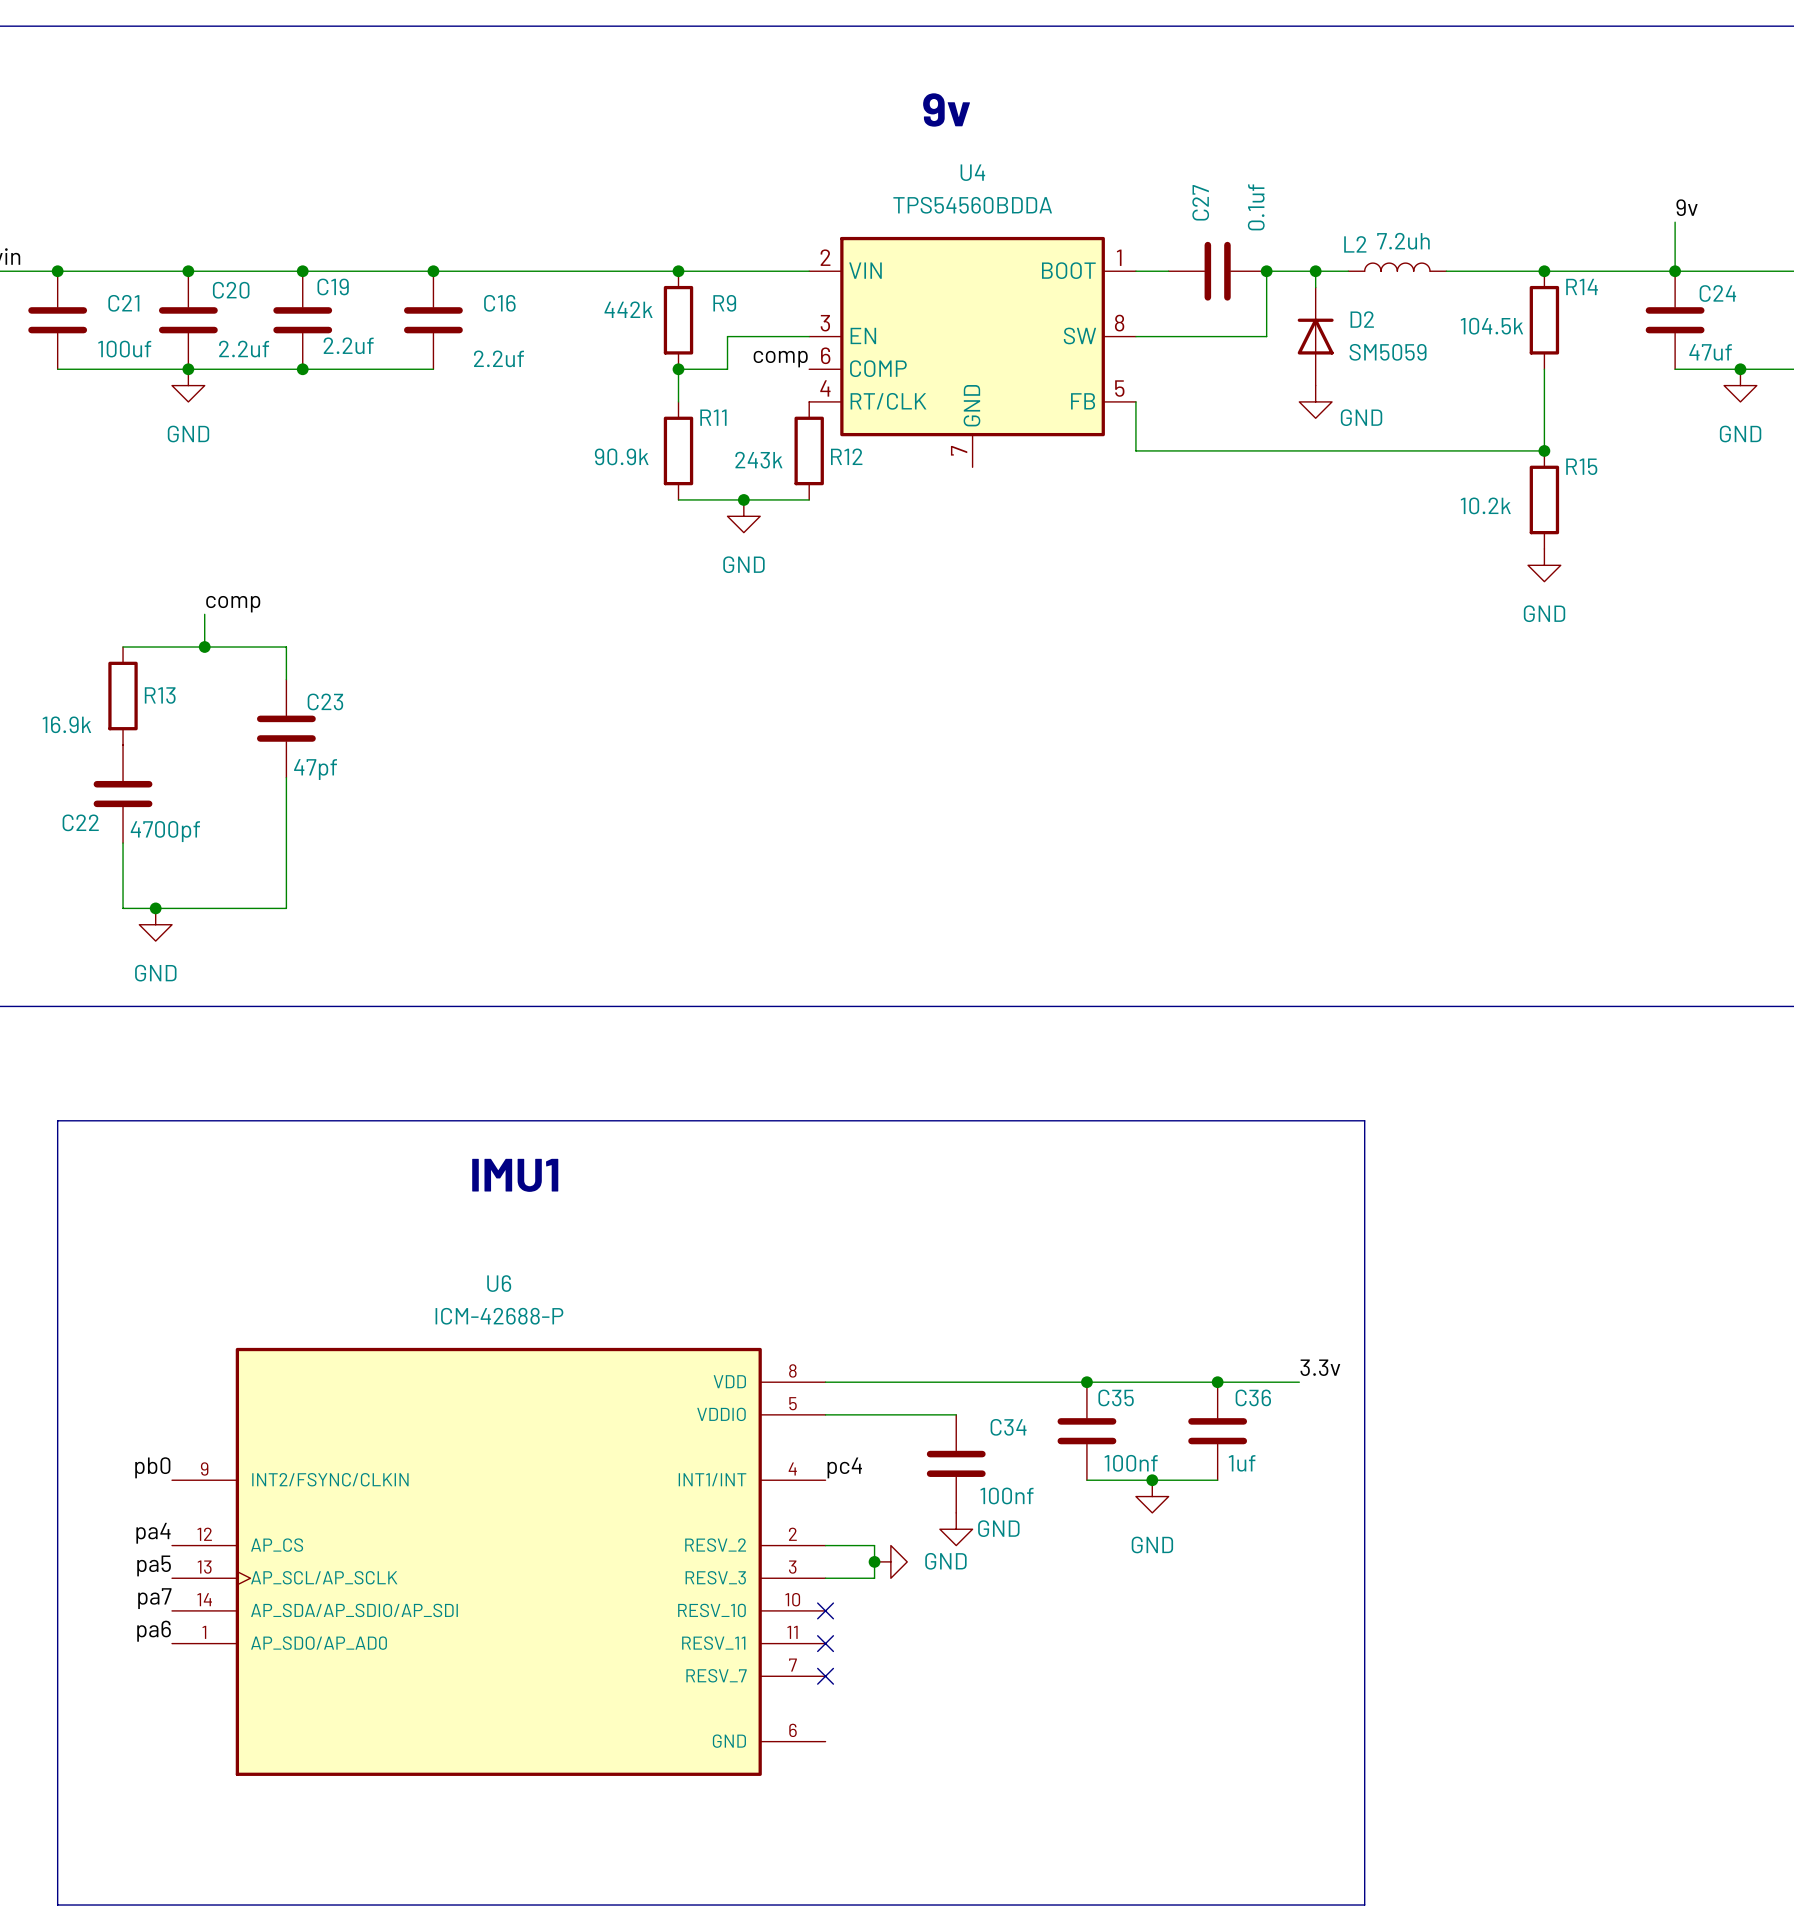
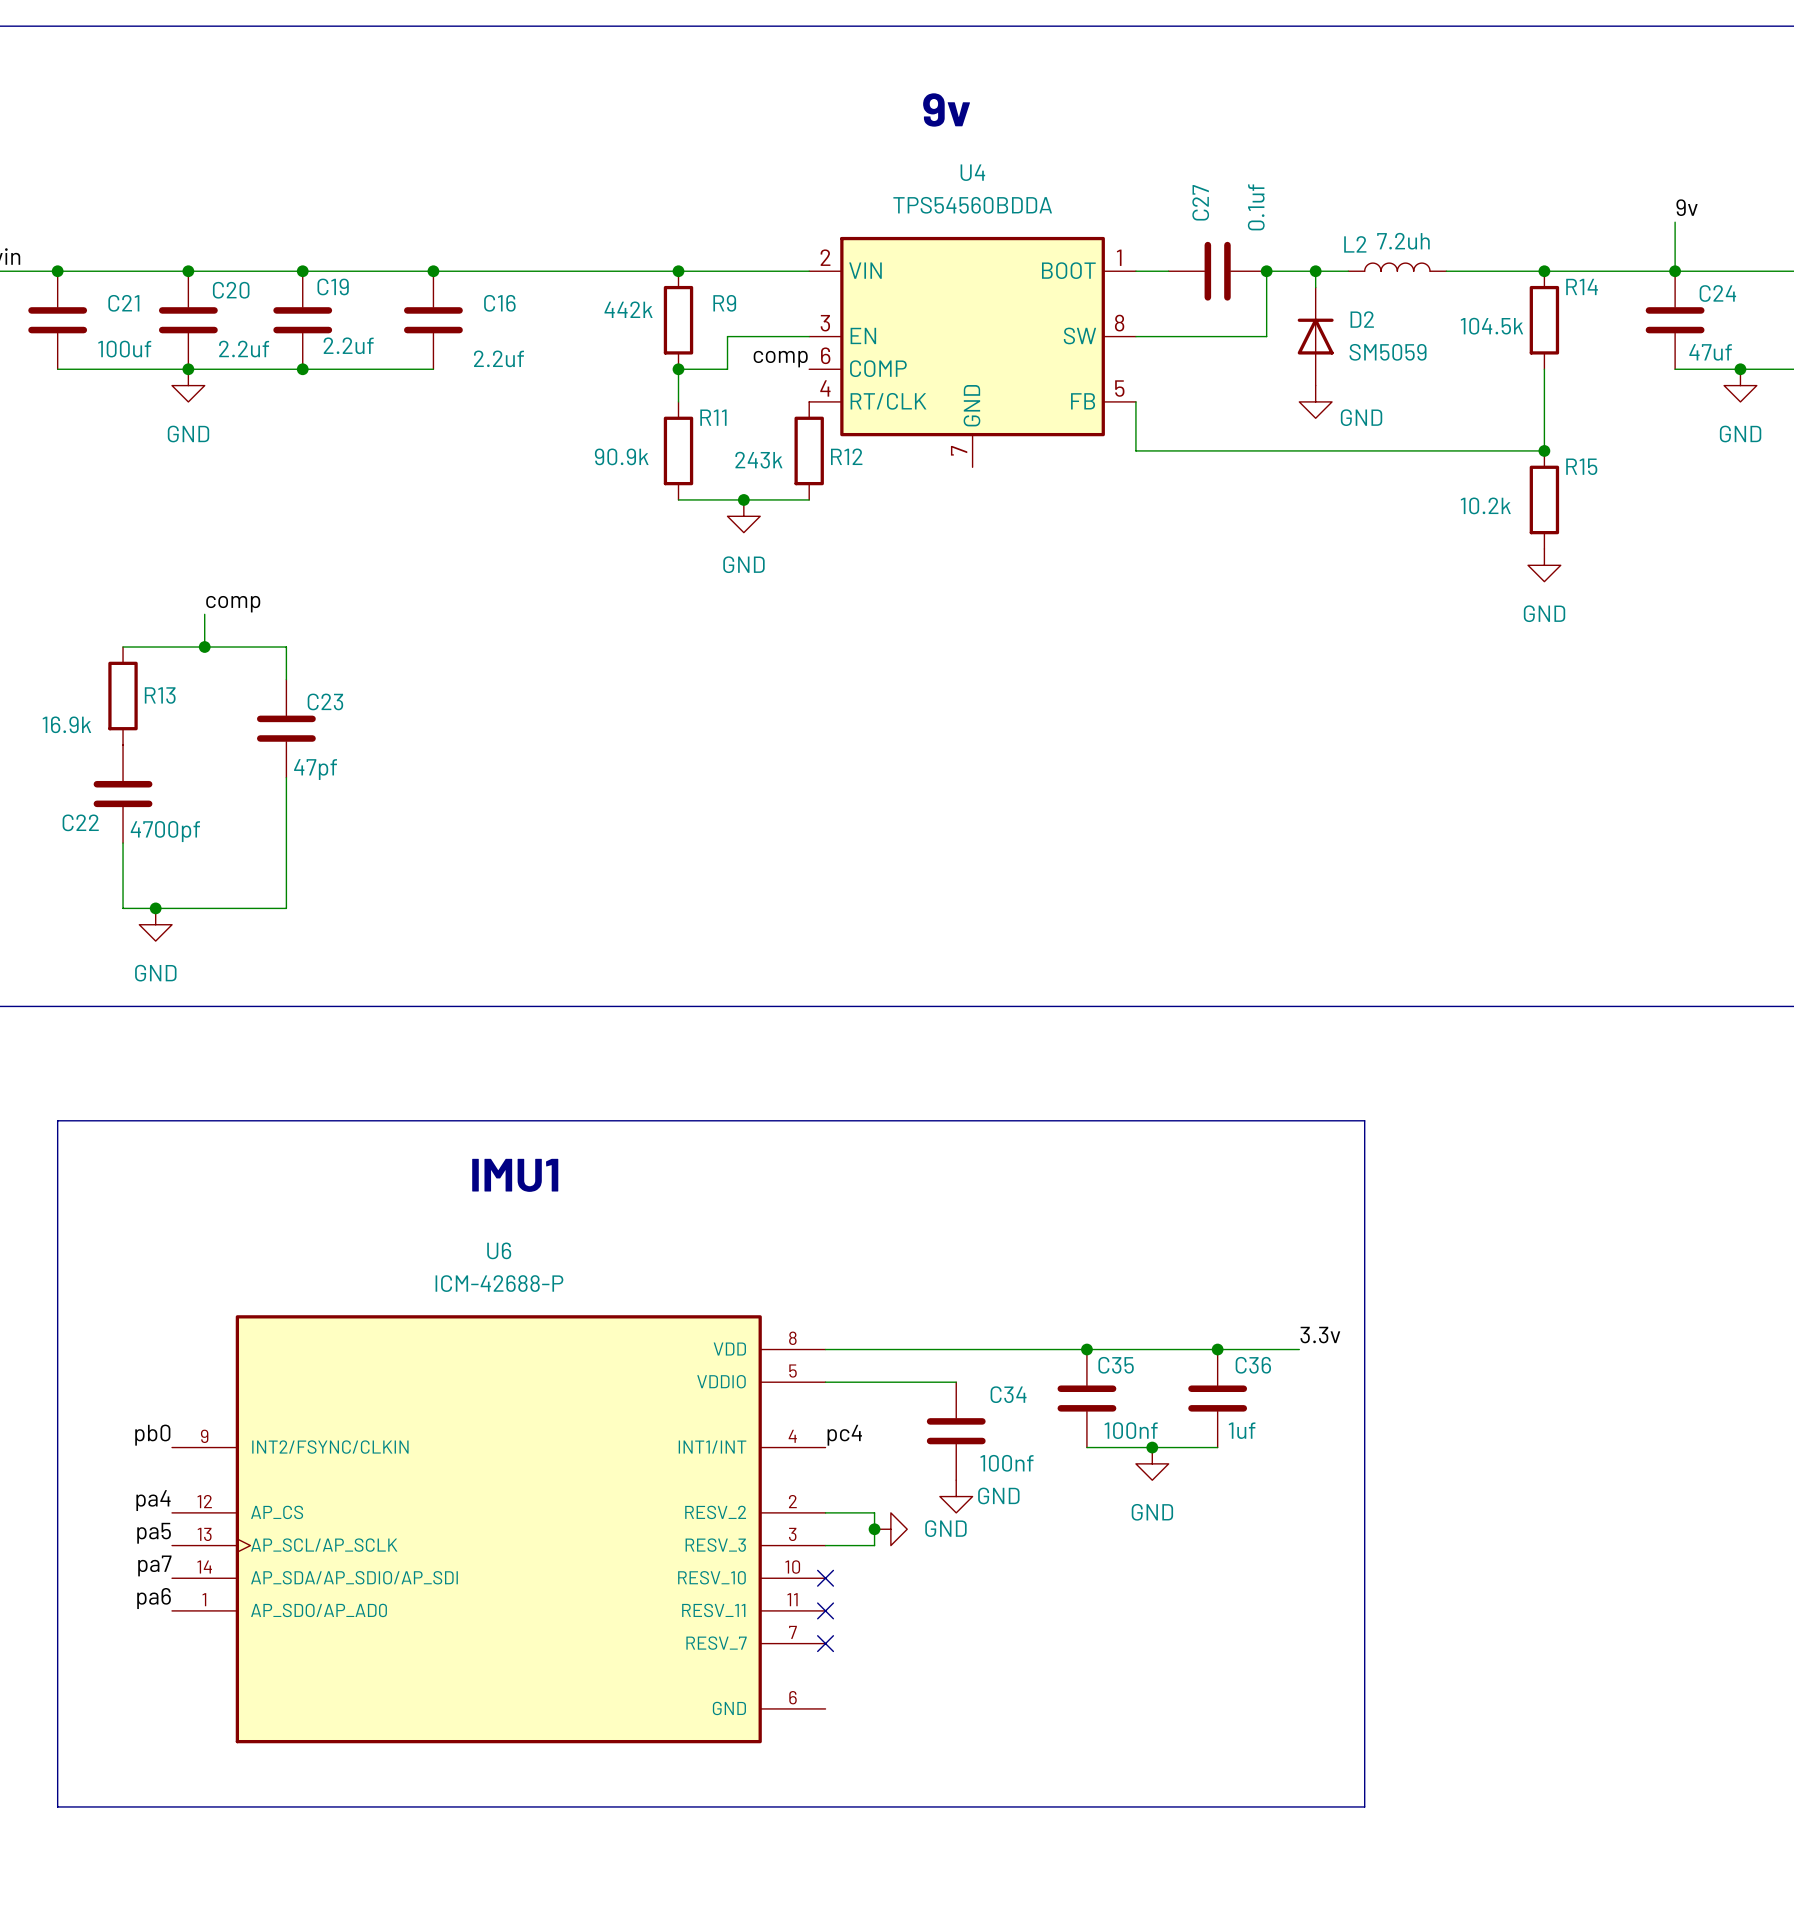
wire: none -> (825, 1349) (1299, 1349)
label position: 3.3v (1320, 1367) -> 3.3v (1320, 1335)
wire: (956, 1382) (1299, 1382) -> none
junction position: (1086, 1382) -> (1086, 1349)
junction position: (1217, 1382) -> (1217, 1349)
wire: (825, 1414) (956, 1414) -> none
C35 position: (1086, 1431) -> (1086, 1398)
C36 position: (1217, 1431) -> (1217, 1398)
C34 position: (956, 1463) -> (956, 1431)
label position: pb0 (152, 1467) -> pb0 (152, 1435)
label position: pc4 (844, 1467) -> pc4 (844, 1435)
wire: (1086, 1480) (1217, 1480) -> (1086, 1447) (1217, 1447)
junction position: (1152, 1480) -> (1152, 1447)
power symbol: none -> GND (956, 1496)
power symbol position: GND (1152, 1496) -> GND (1152, 1463)
label: none -> pa4 (153, 1500)
power symbol: none -> GND (890, 1529)
power symbol: GND (956, 1529) -> none
label: pa4 (153, 1533) -> pa5 (154, 1533)
wire: (874, 1545) (874, 1578) (825, 1578) -> (874, 1545) (874, 1512) (825, 1512)
U6 position: (498, 1561) -> (498, 1529)
junction position: (874, 1561) -> (874, 1529)
power symbol: GND (890, 1561) -> none
label: pa5 (154, 1565) -> pa7 (154, 1565)
no-connect mark: none -> (825, 1578)
label: pa7 (154, 1598) -> pa6 (154, 1598)
label: pa6 (154, 1631) -> none
no-connect mark: (825, 1676) -> none
line: (57, 1806) (57, 1905) (1364, 1905) (1364, 1806) -> (57, 1806) (1364, 1806)

